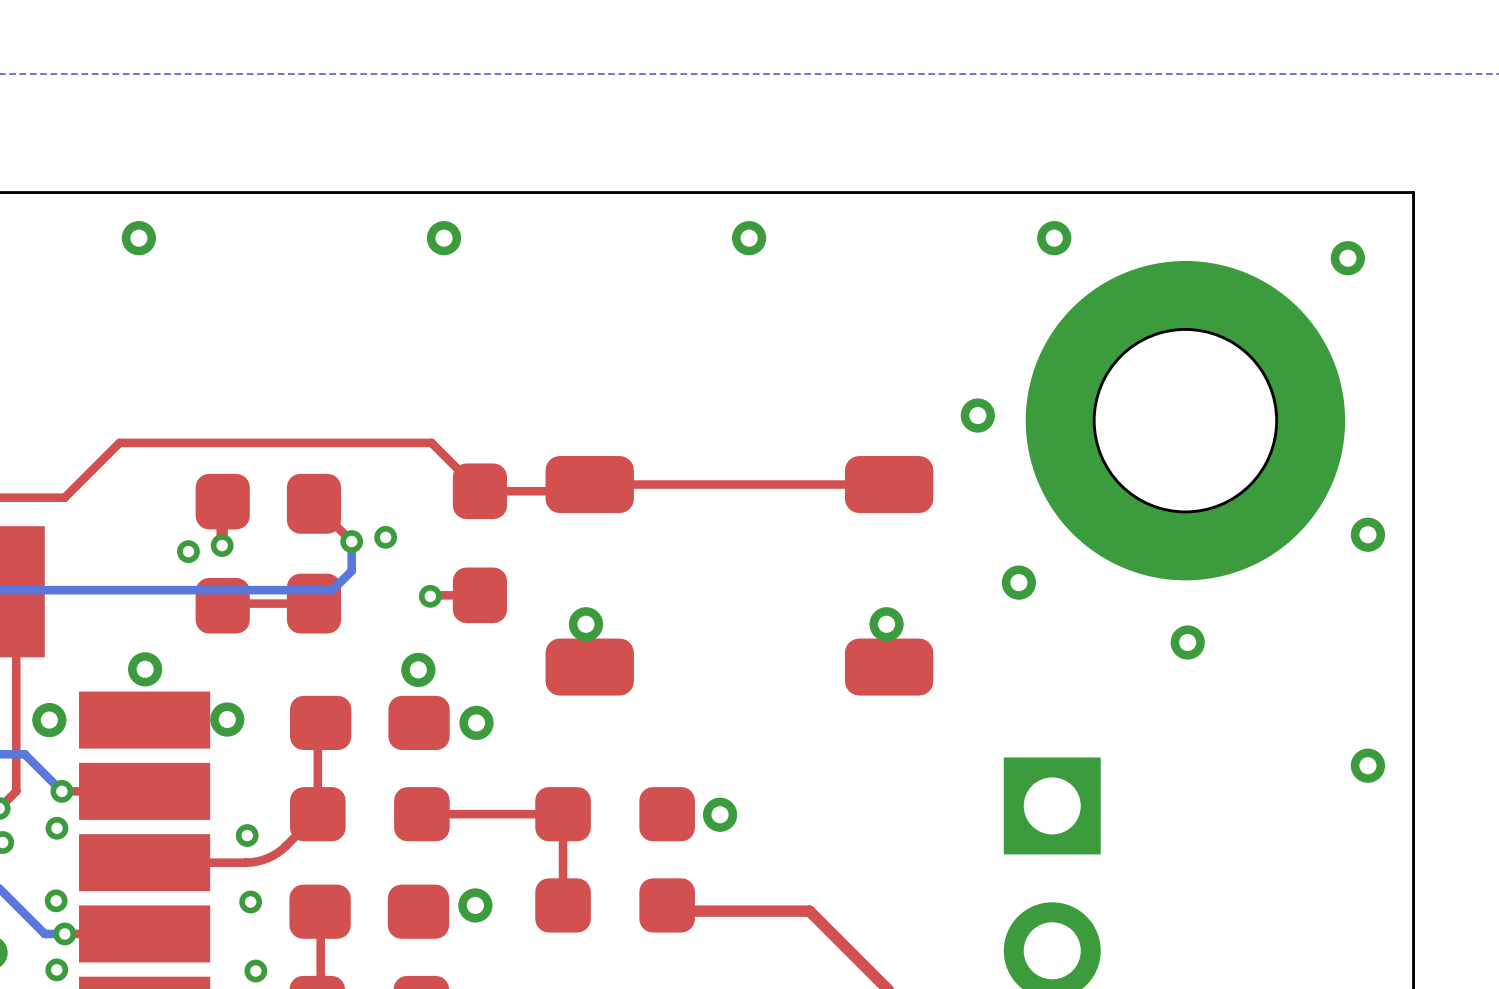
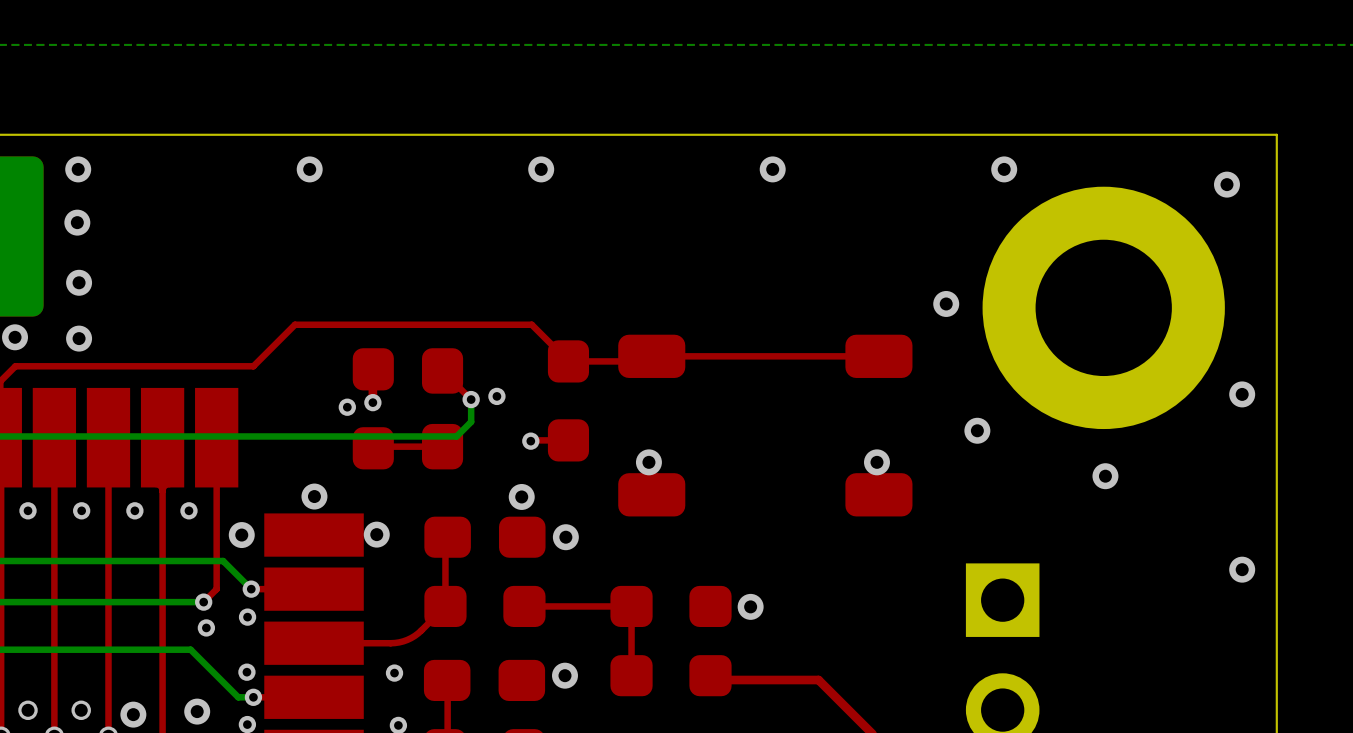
via: (247, 835) -> none

